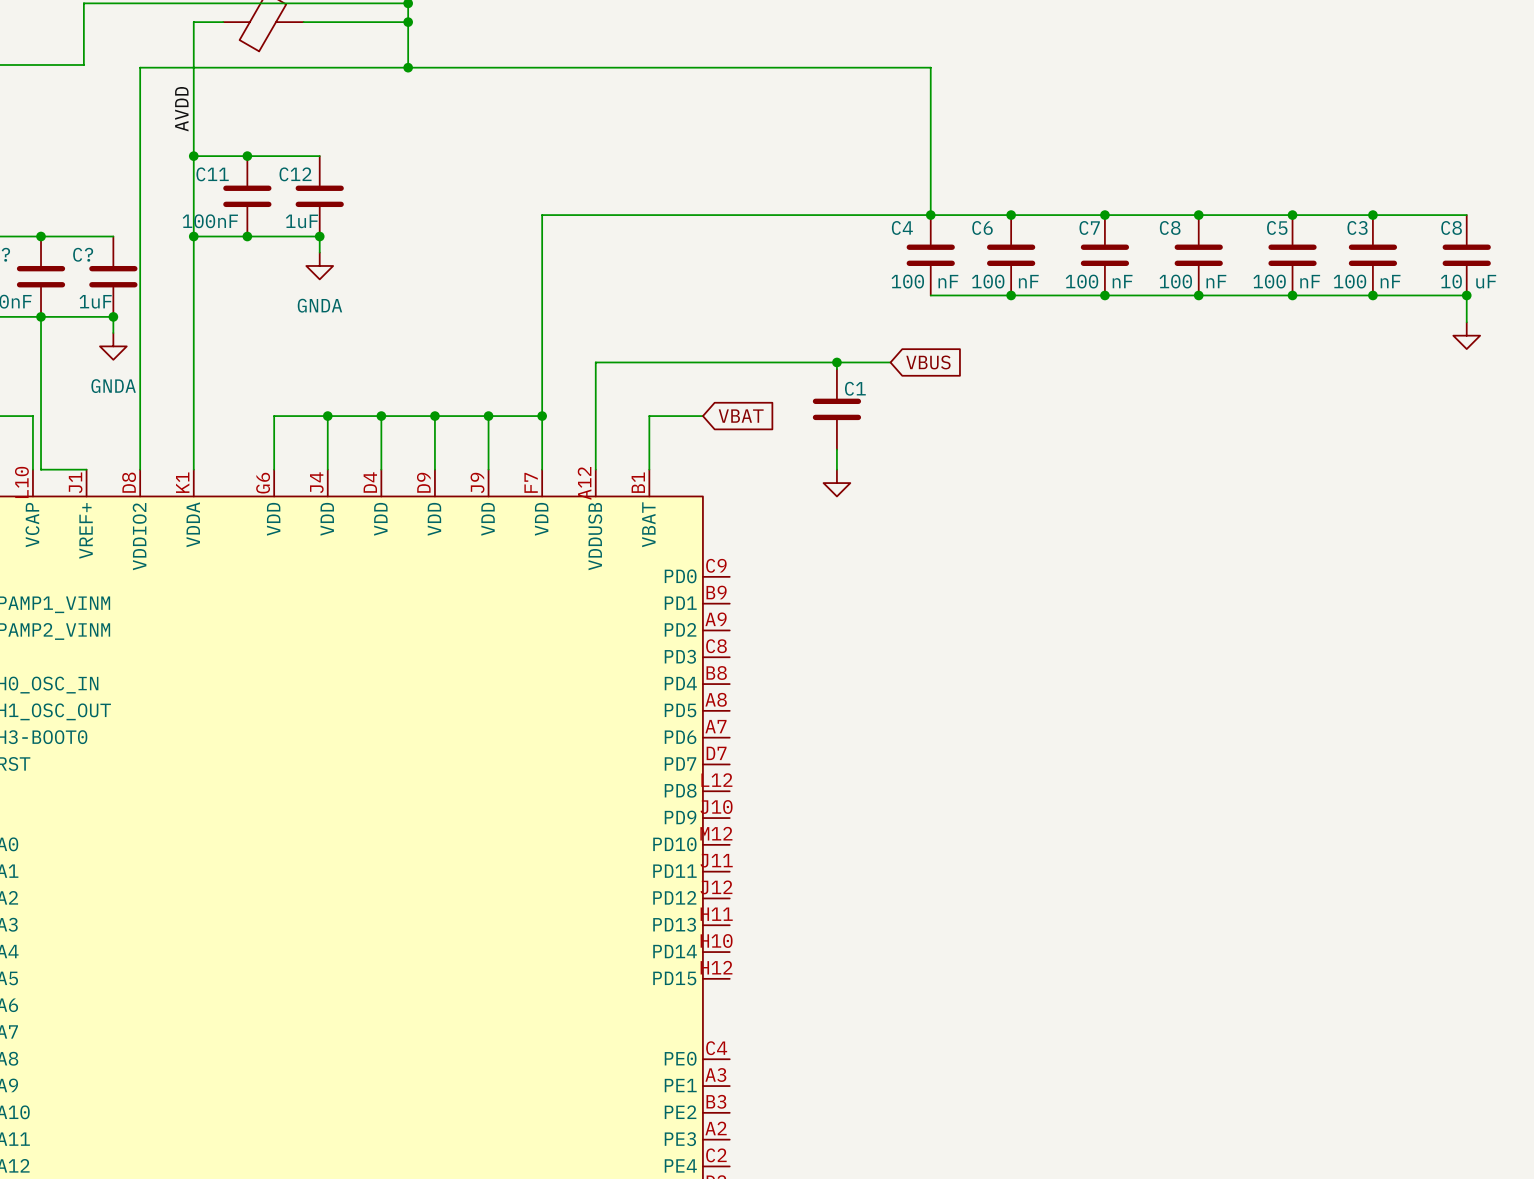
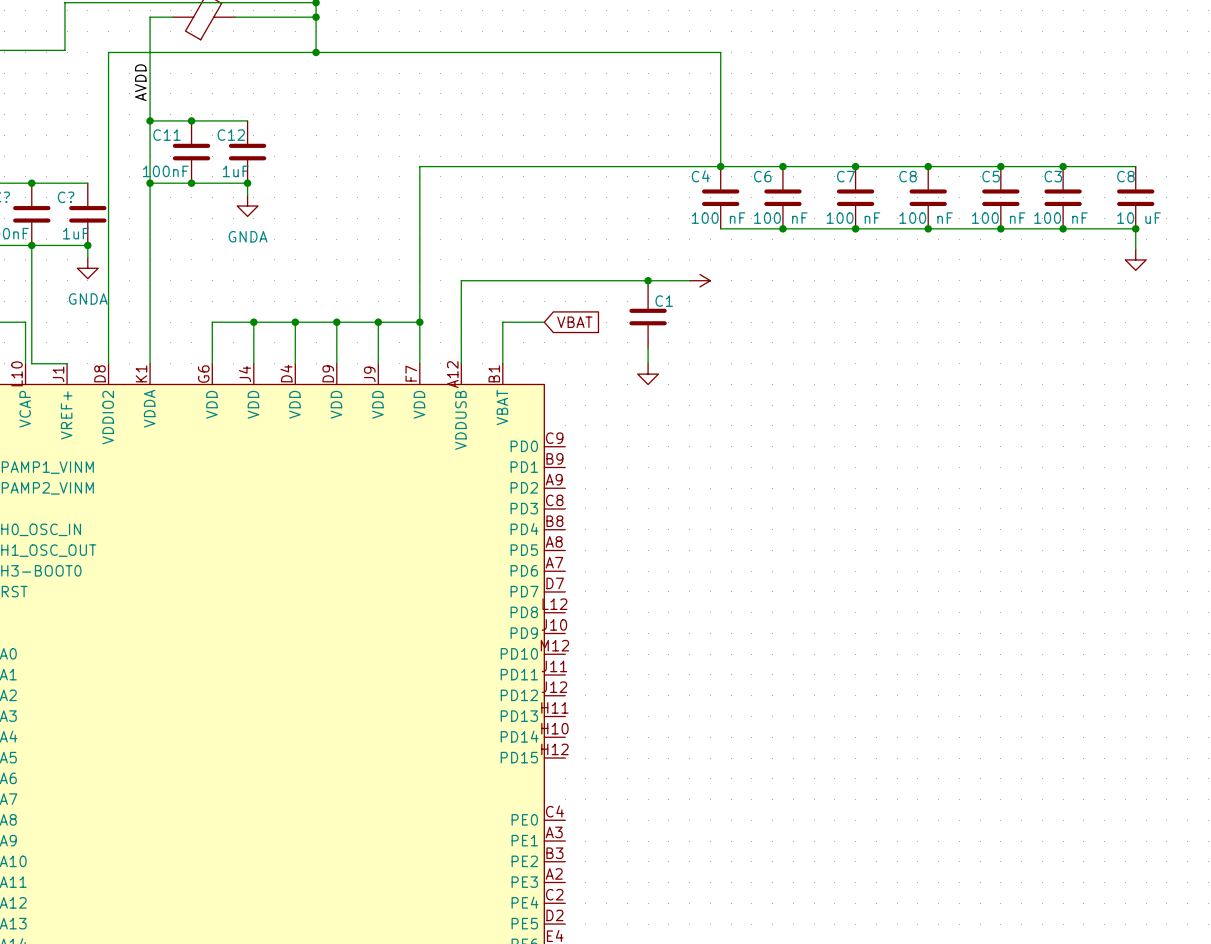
power symbol: none -> (699, 280)
global label: VBUS (928, 362) -> none

